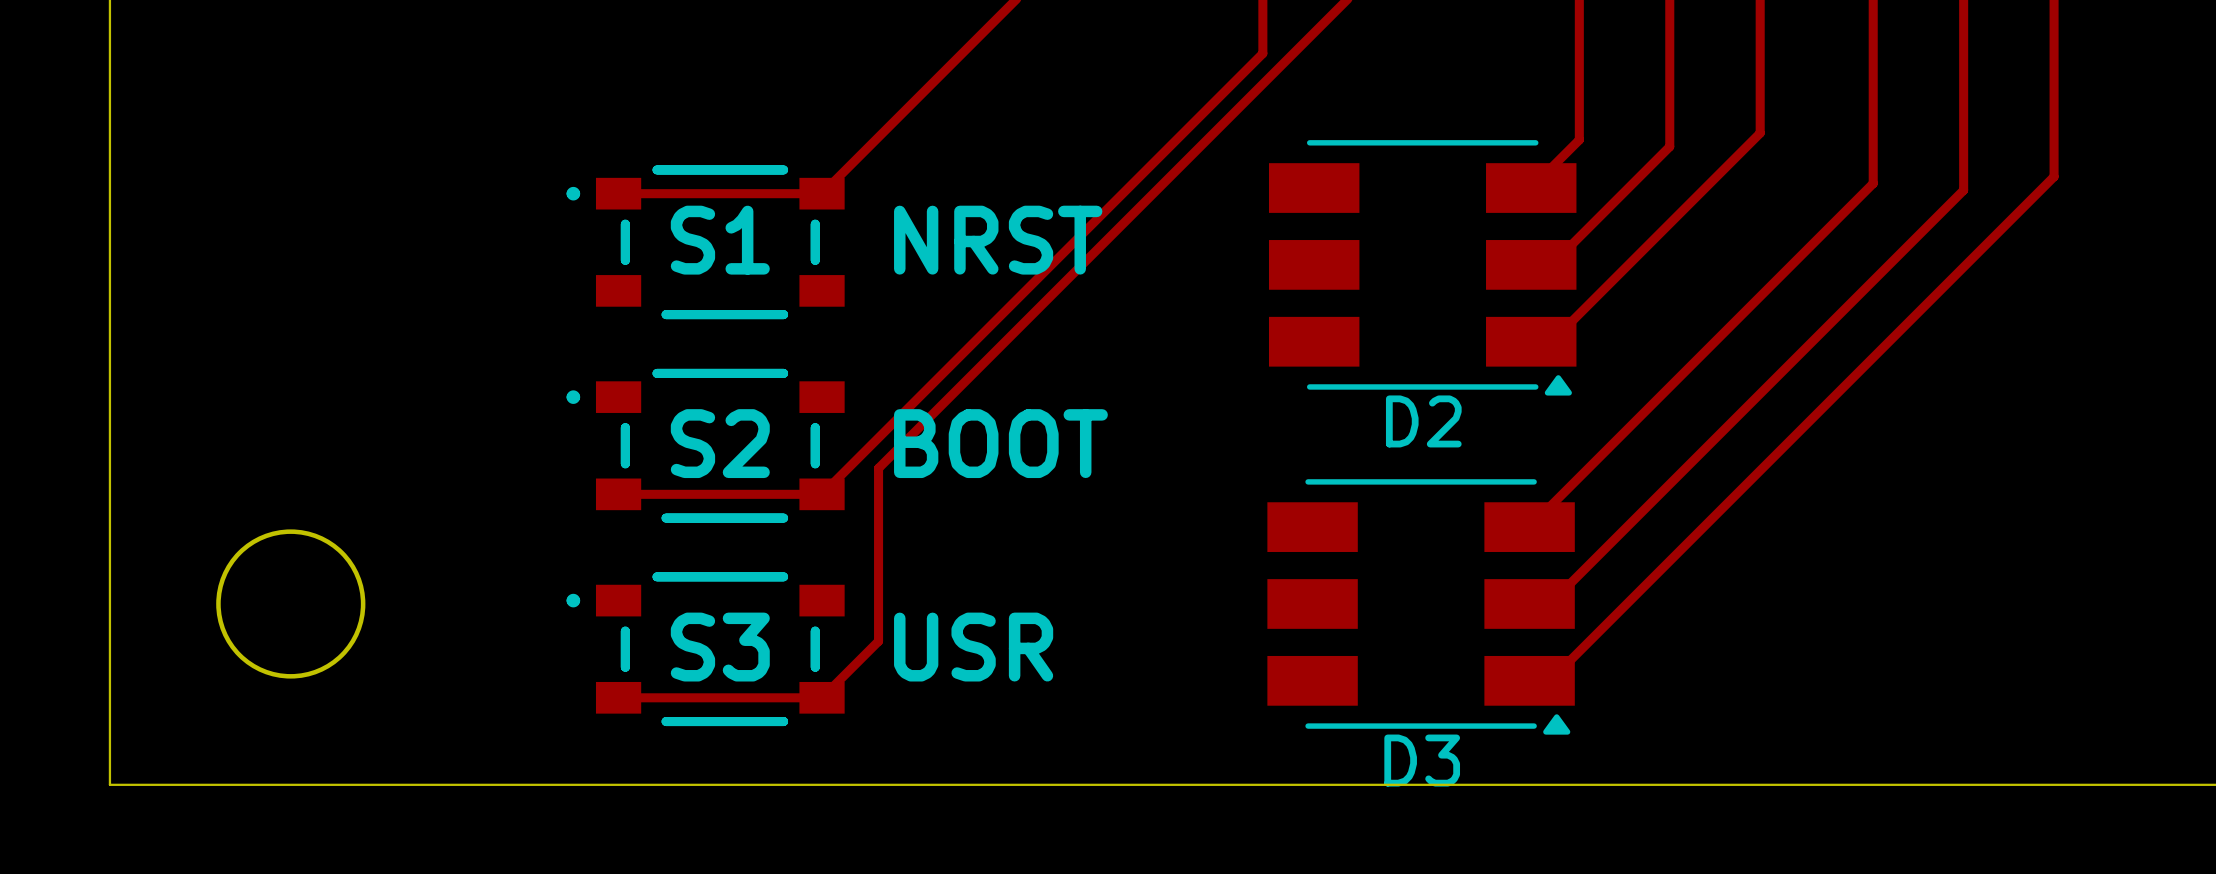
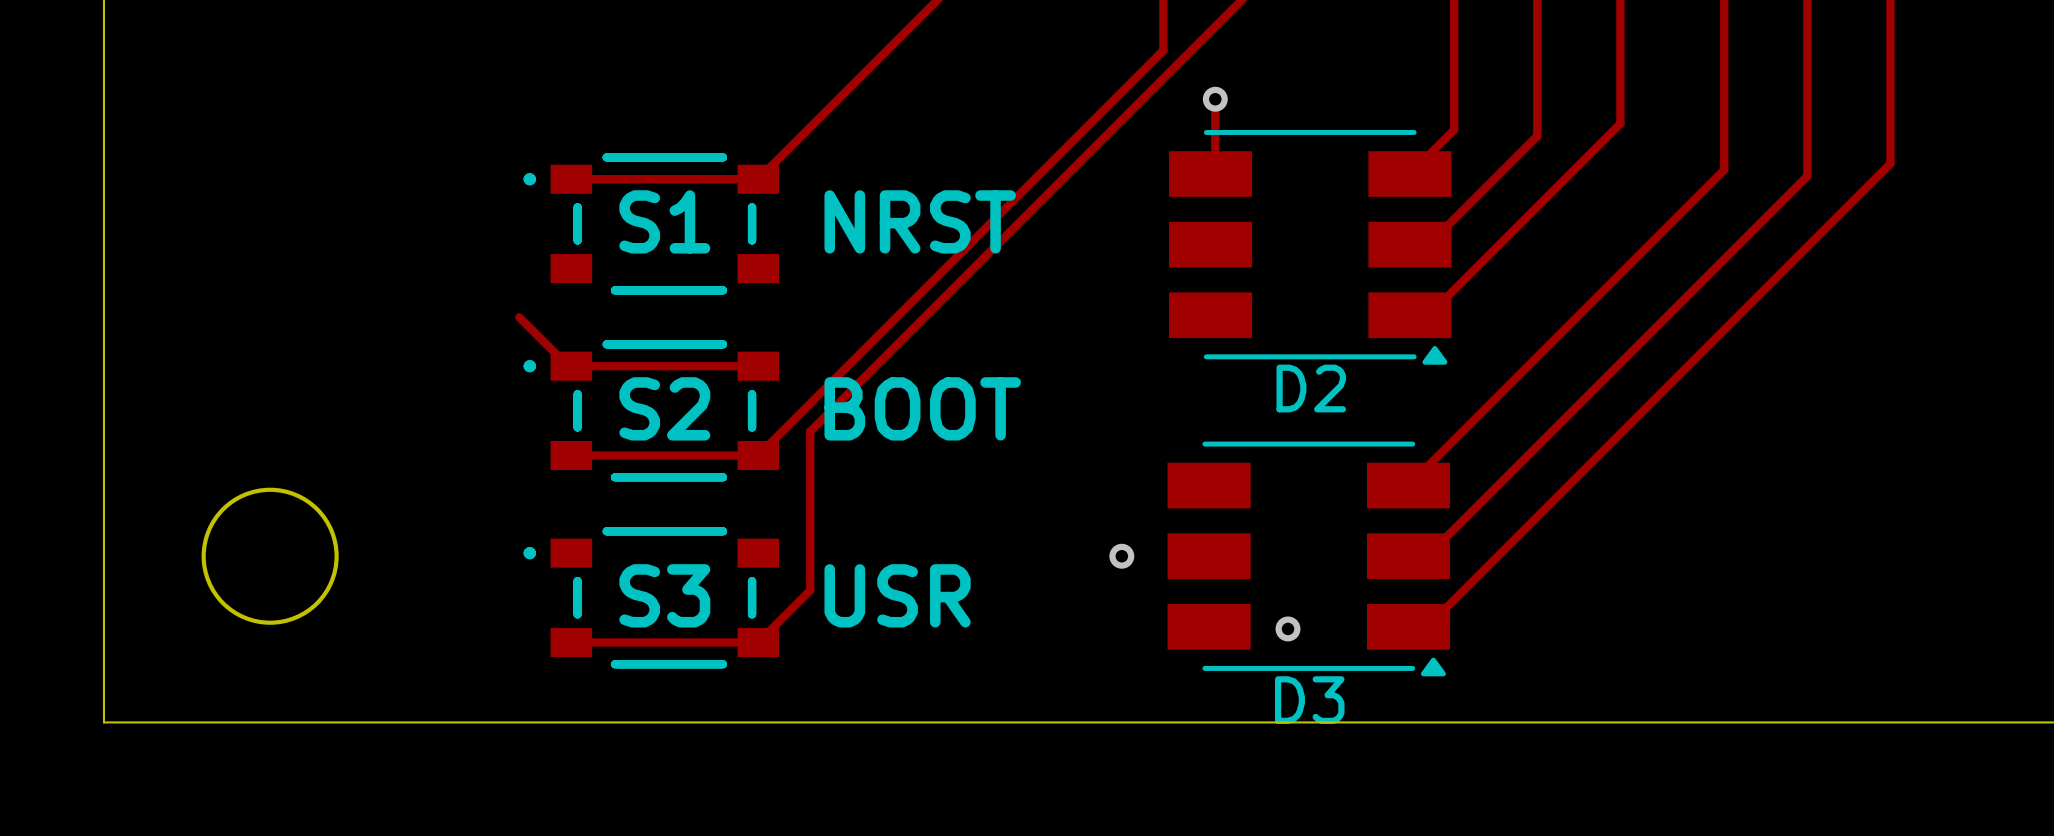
track: none -> (1215, 99) (1215, 169) (1210, 174)
via: none -> (1215, 99)
track: none -> (519, 317) (568, 366) (758, 366)
via: none -> (1121, 556)
via: none -> (1288, 628)

